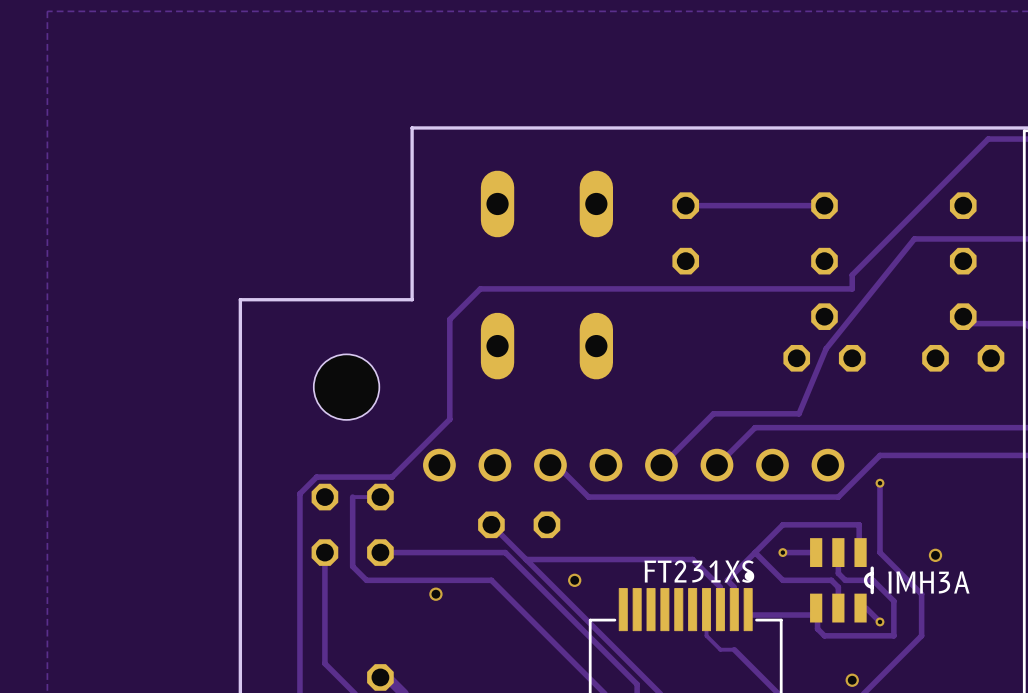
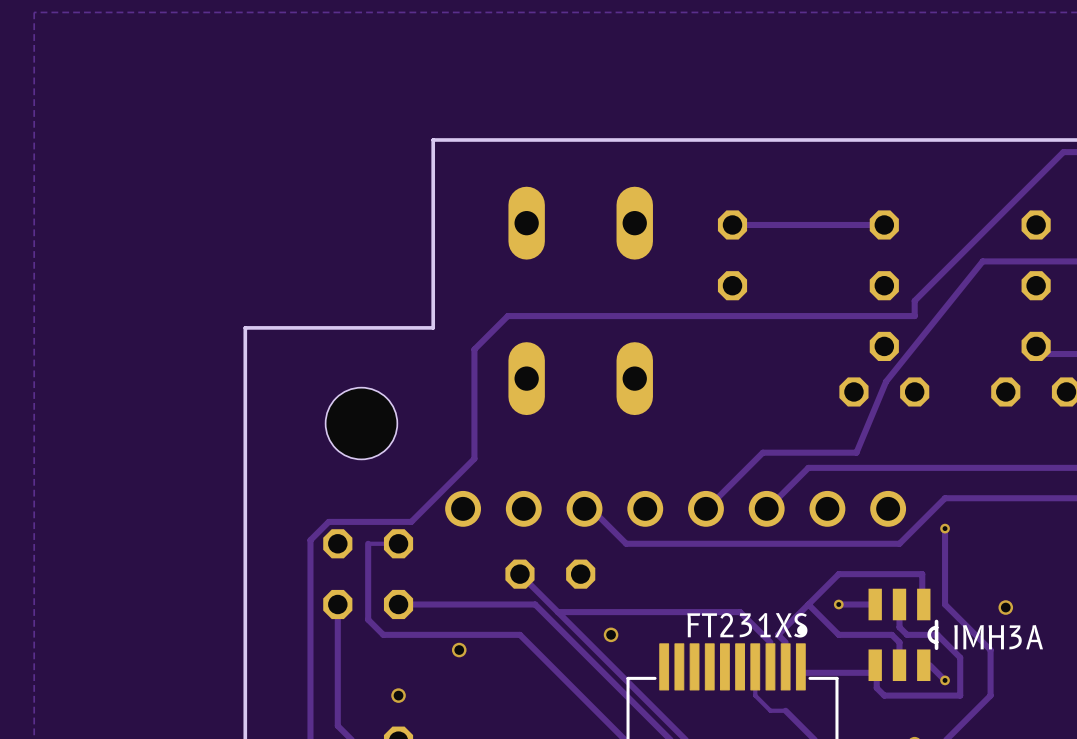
via: none -> (398, 695)

